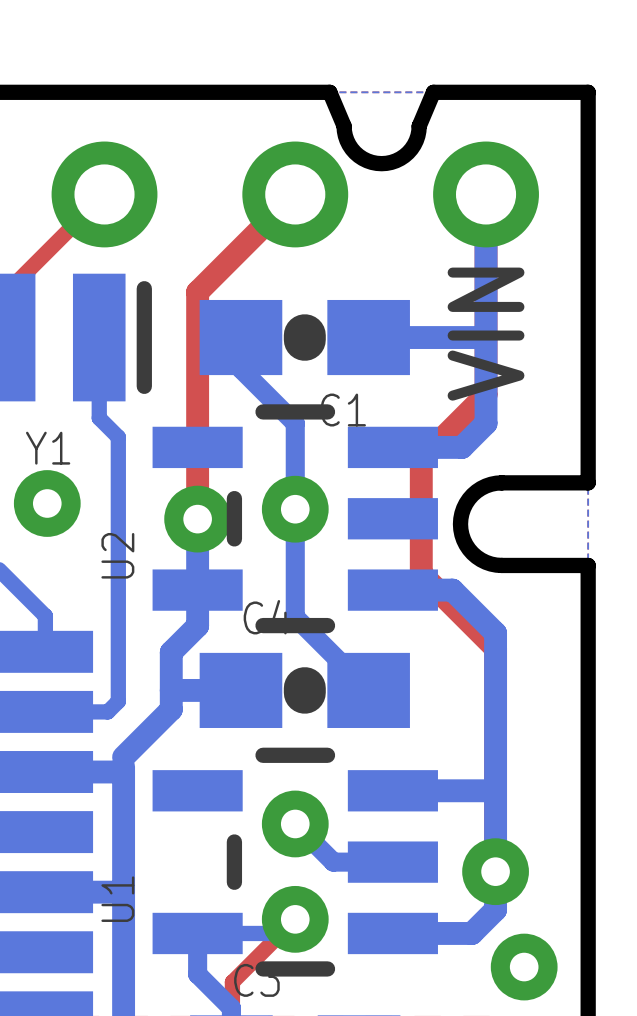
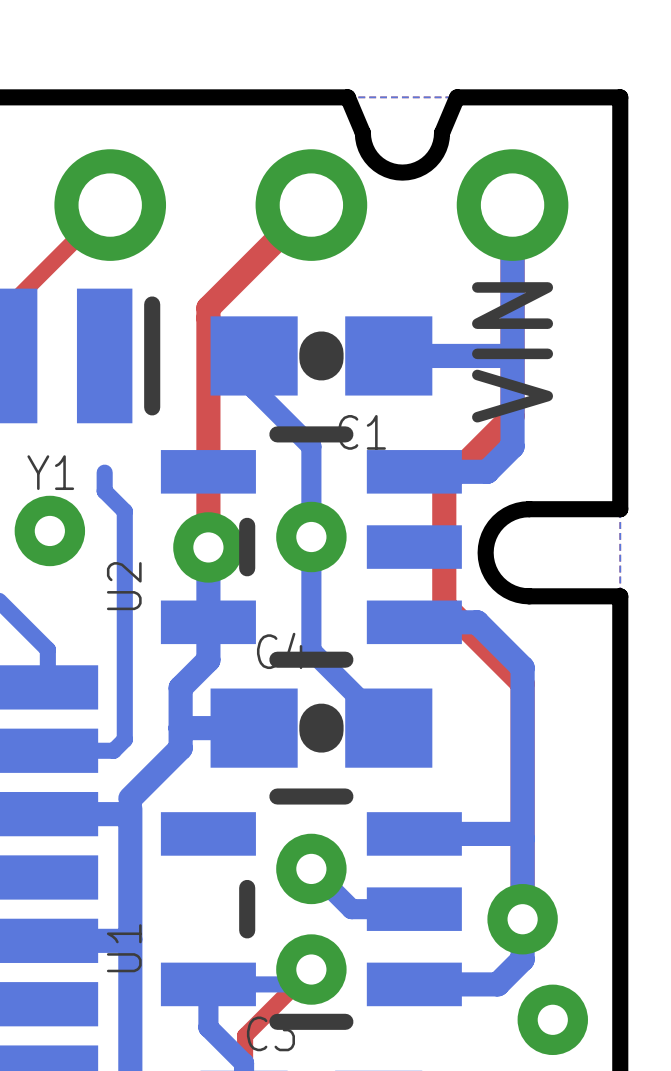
bottom track: (99, 337) (99, 418) (118, 437) (118, 484) -> (104, 472) (104, 491) (124, 511)

